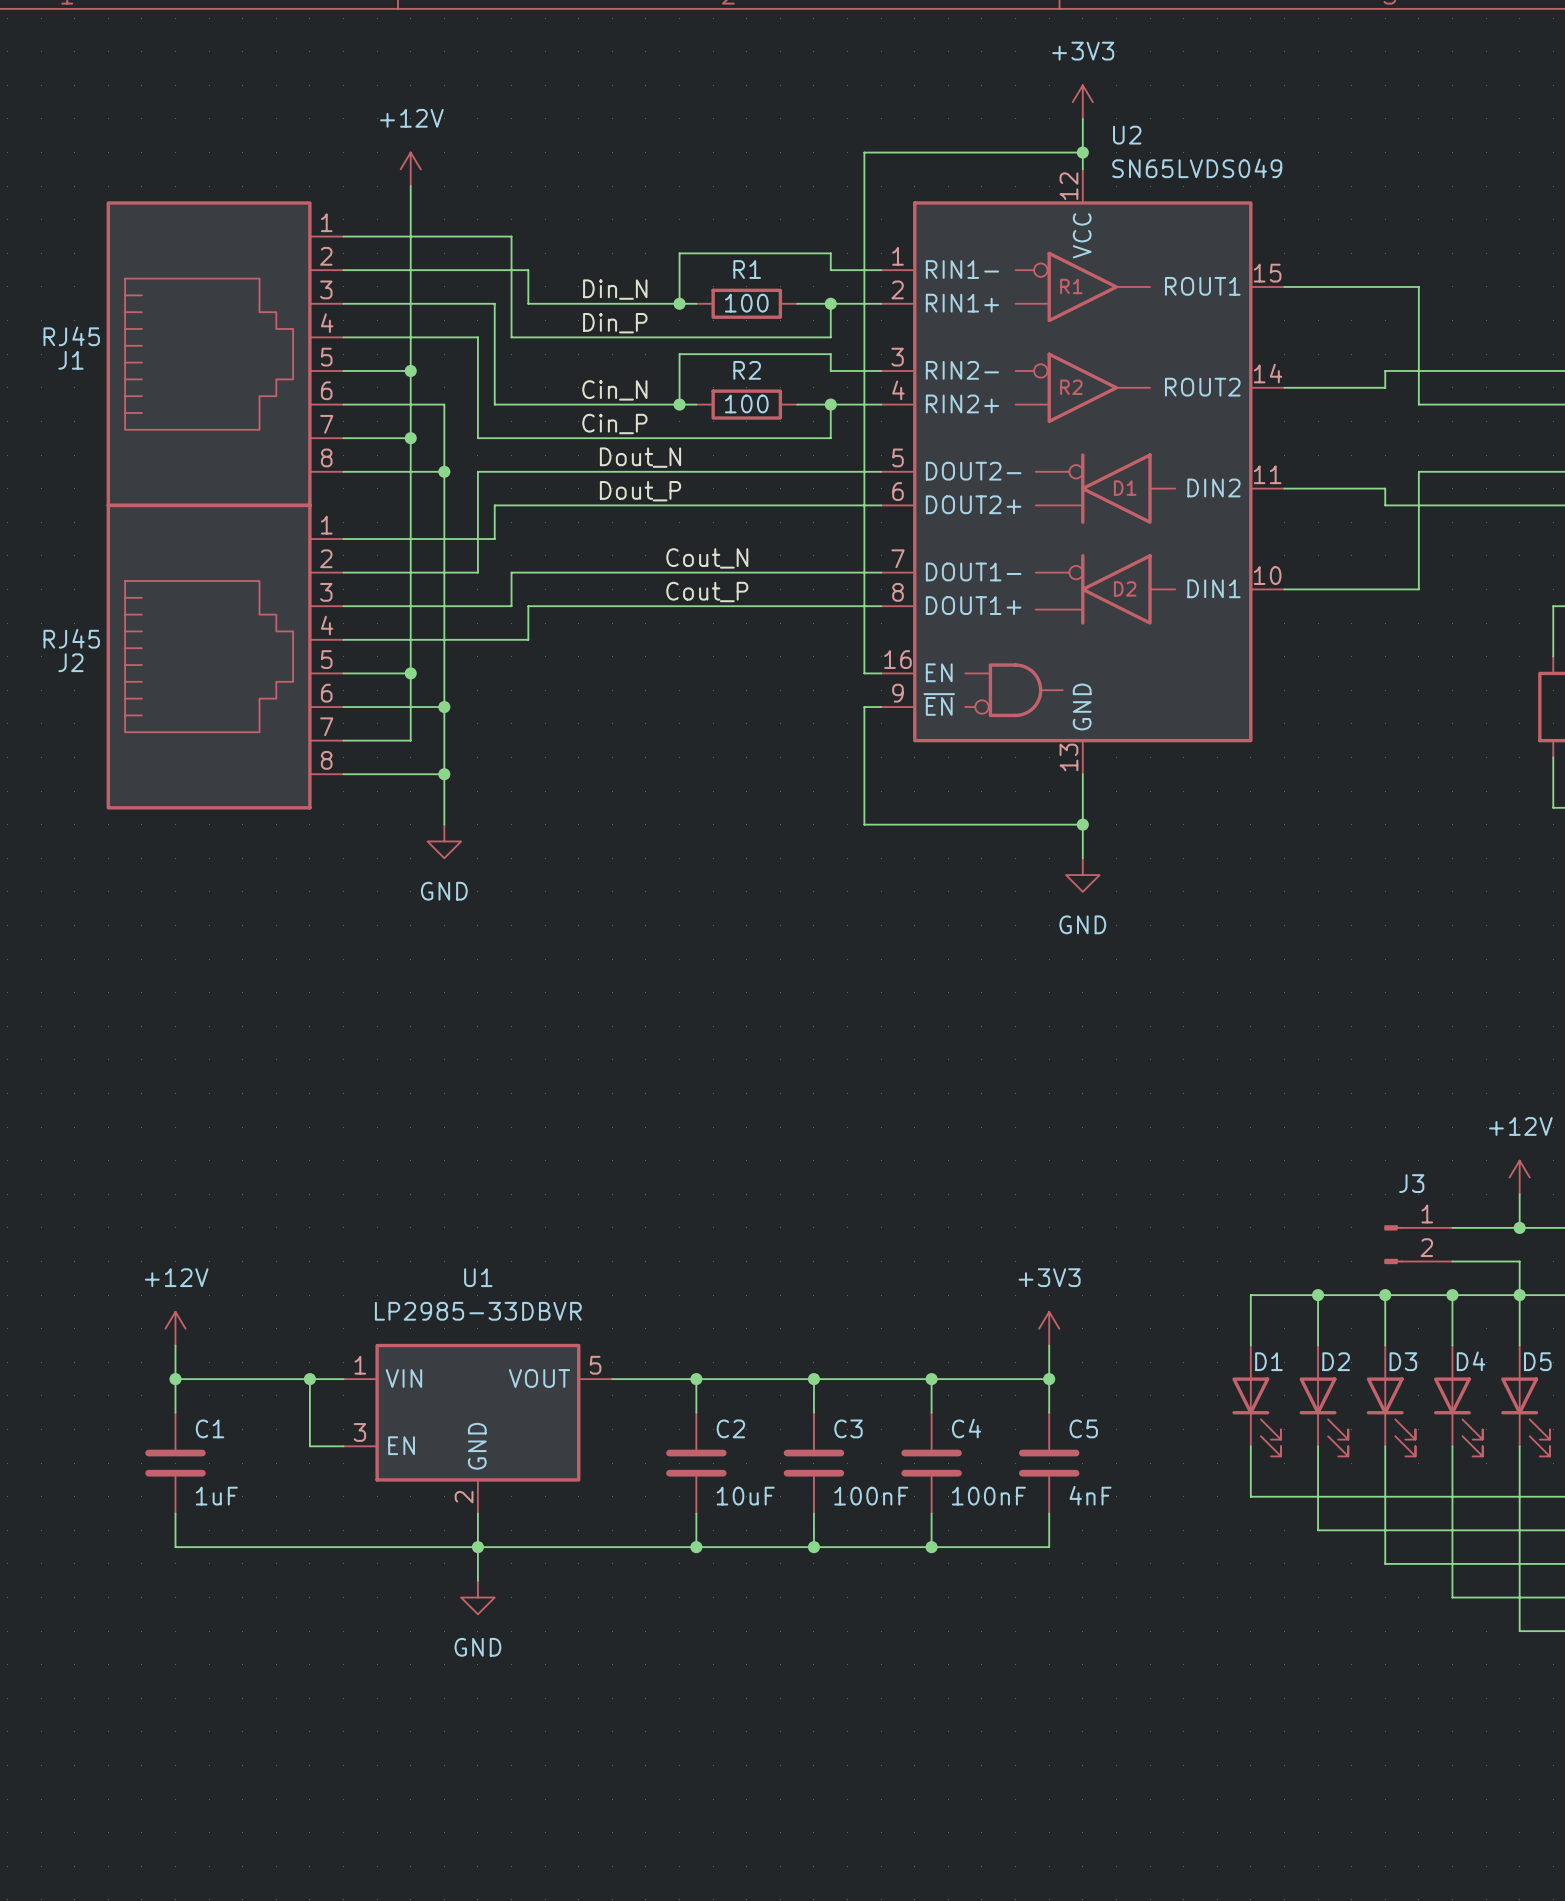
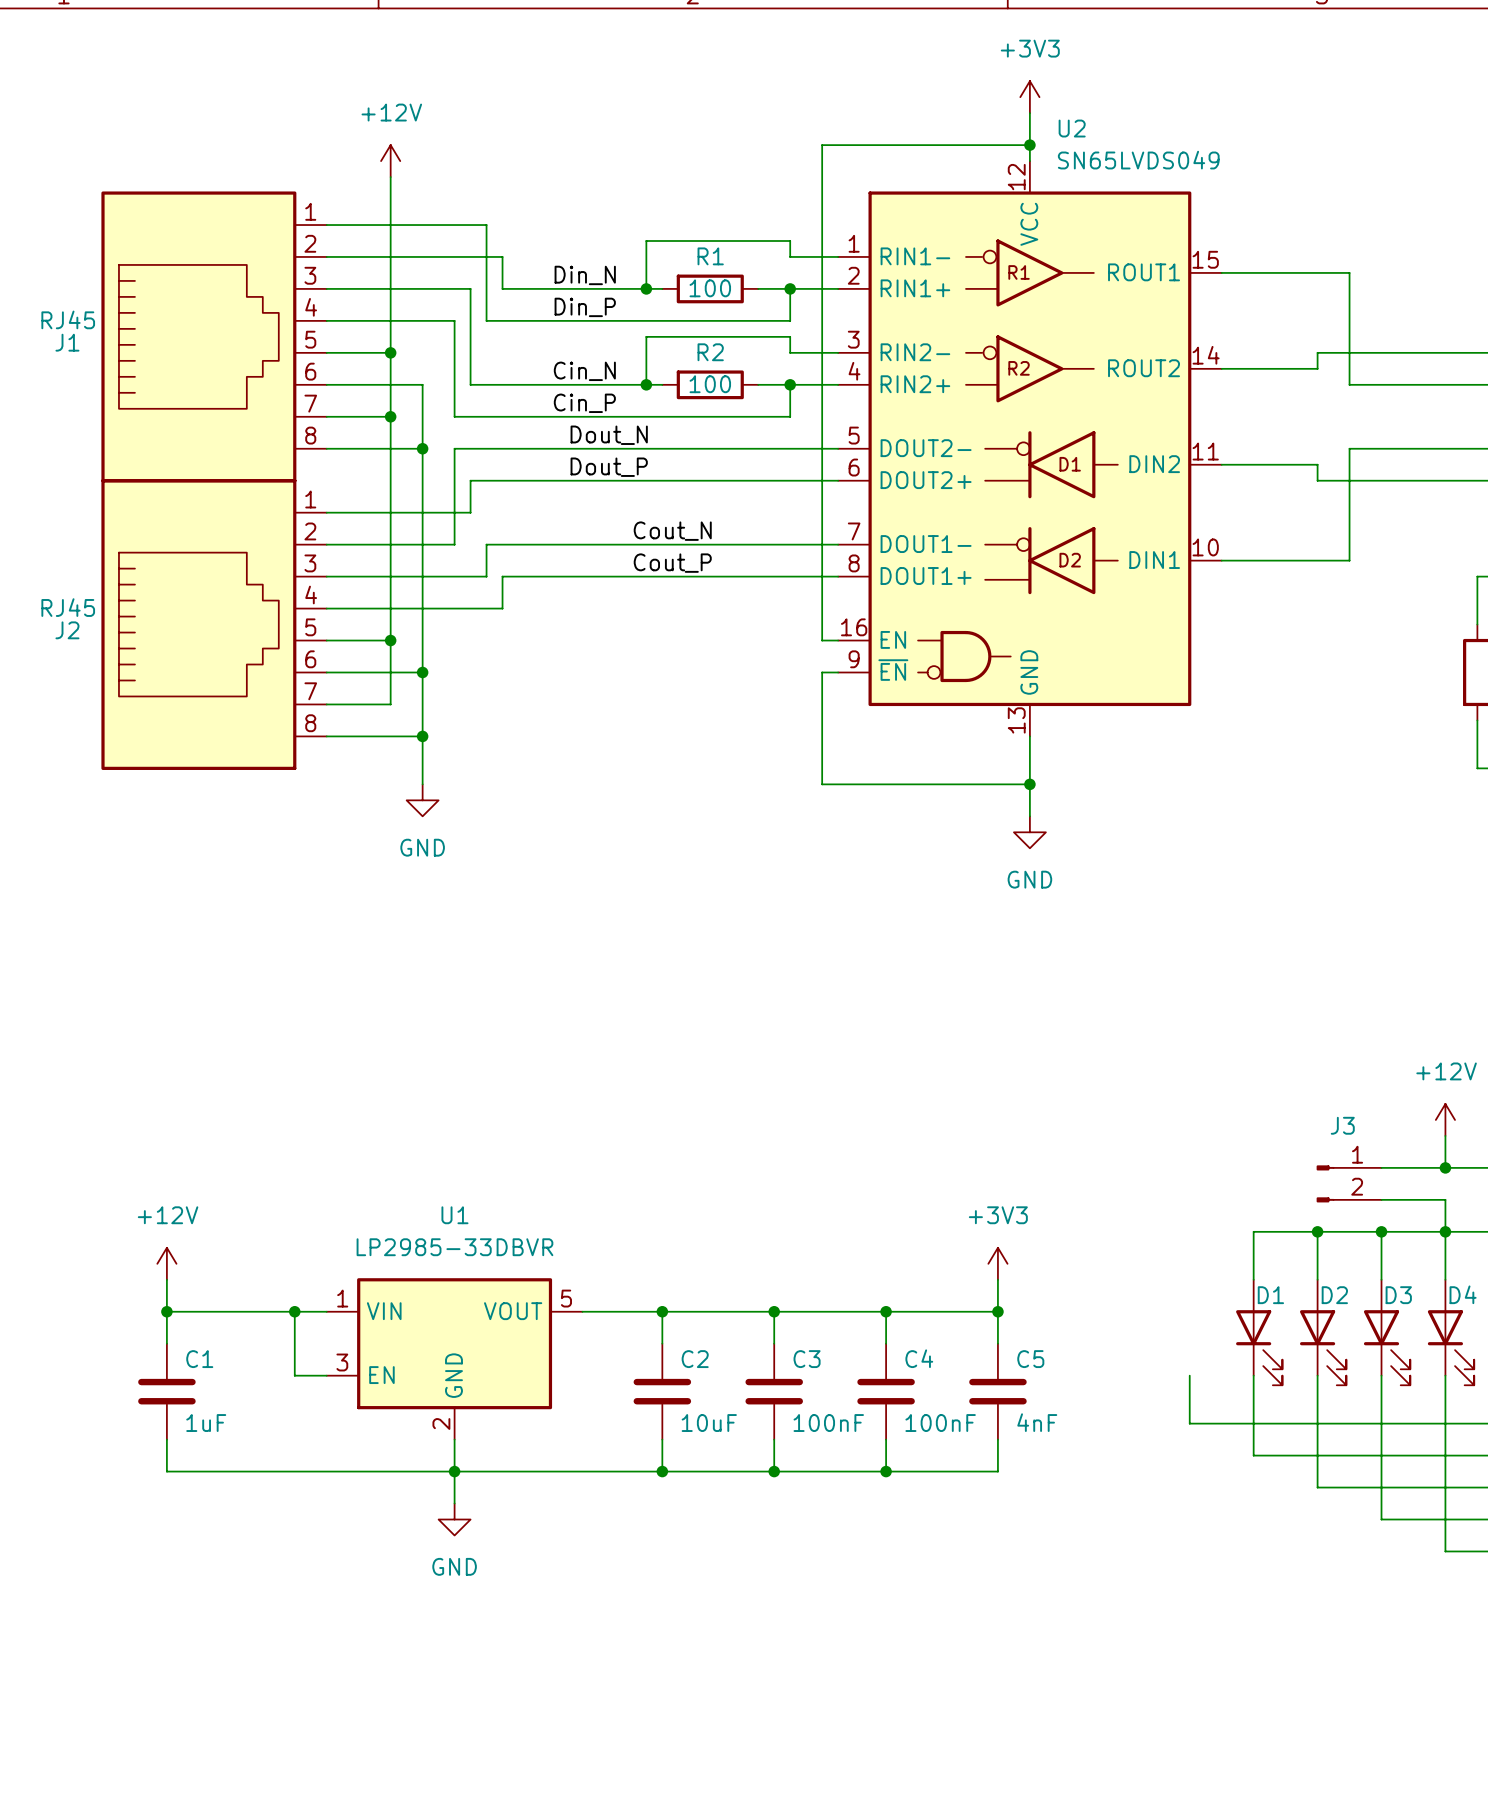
wire: (1318, 1295) (1250, 1295) (1250, 1345) -> none
junction: (1318, 1295) -> none
D2 name: D2 (1336, 1361) -> D1 (1270, 1295)
D3 name: D3 (1403, 1361) -> D2 (1334, 1295)
D4 name: D4 (1470, 1361) -> D3 (1398, 1295)
D5 name: D5 (1537, 1361) -> D4 (1463, 1294)
D1: (1256, 1400) -> none

